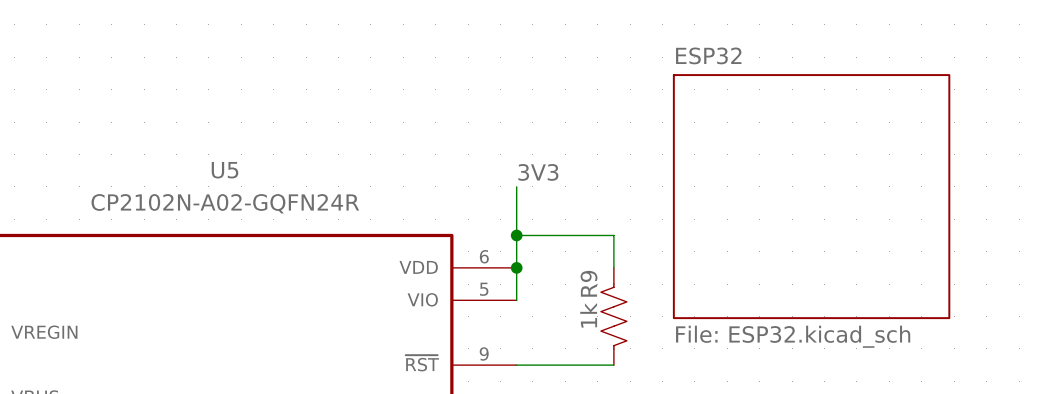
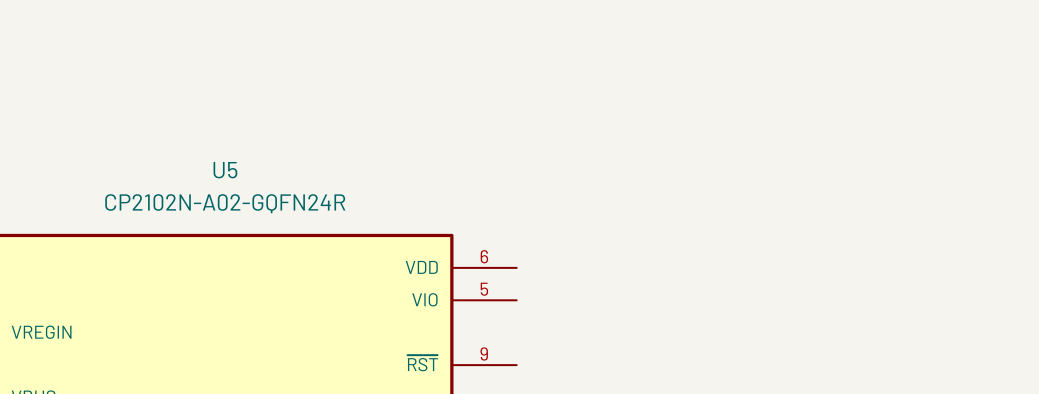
label: 3V3 (538, 172) -> none
wire: (516, 186) (516, 300) -> none
sheet ESP32: File: ESP32.kicad_sch (811, 196) -> none
wire: (516, 235) (613, 235) (613, 267) -> none
junction: (516, 235) -> none
junction: (516, 267) -> none
R9: 1k (613, 316) -> none
wire: (516, 365) (613, 365) -> none

